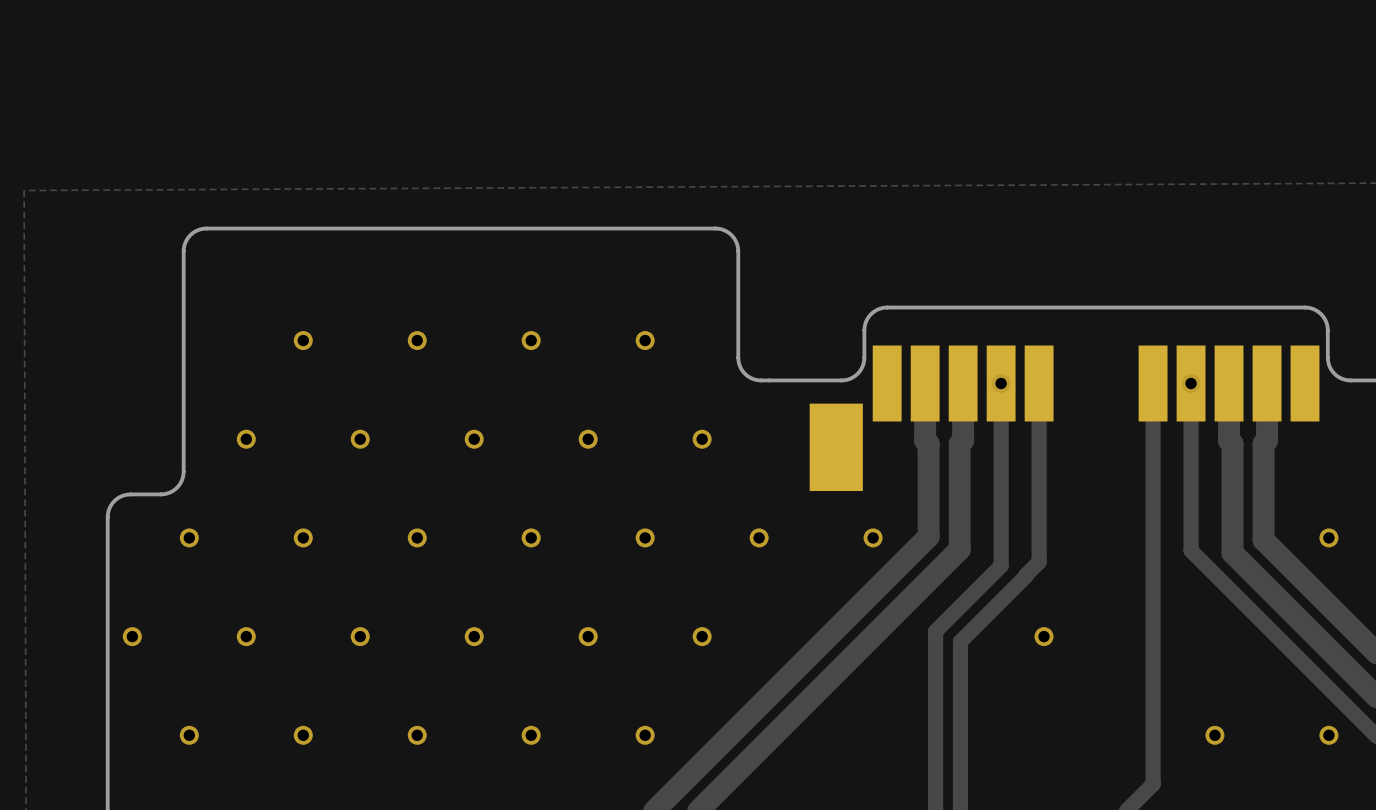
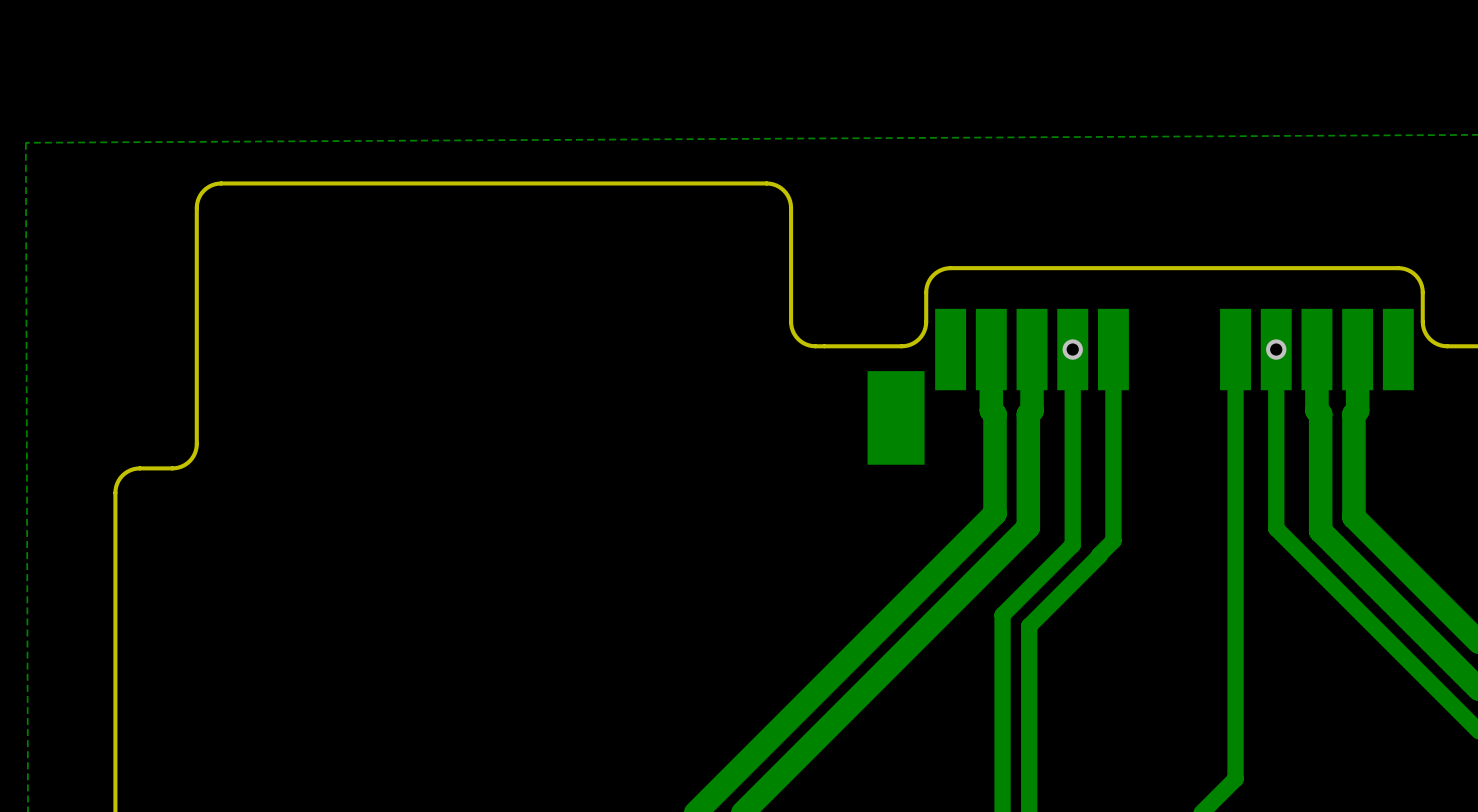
via: (303, 340) -> none
via: (417, 340) -> none
via: (531, 340) -> none
via: (645, 340) -> none
via: (246, 439) -> none
via: (360, 439) -> none
via: (474, 439) -> none
via: (588, 439) -> none
via: (702, 439) -> none
via: (189, 537) -> none
via: (303, 537) -> none
via: (417, 537) -> none
via: (531, 537) -> none
via: (645, 537) -> none
via: (759, 537) -> none
via: (873, 537) -> none
via: (1328, 537) -> none
via: (132, 636) -> none
via: (246, 636) -> none
via: (360, 636) -> none
via: (474, 636) -> none
via: (588, 636) -> none
via: (702, 636) -> none
via: (1044, 636) -> none
via: (189, 735) -> none
via: (303, 735) -> none
via: (417, 735) -> none
via: (531, 735) -> none
via: (645, 735) -> none
via: (1214, 735) -> none
via: (1328, 735) -> none

